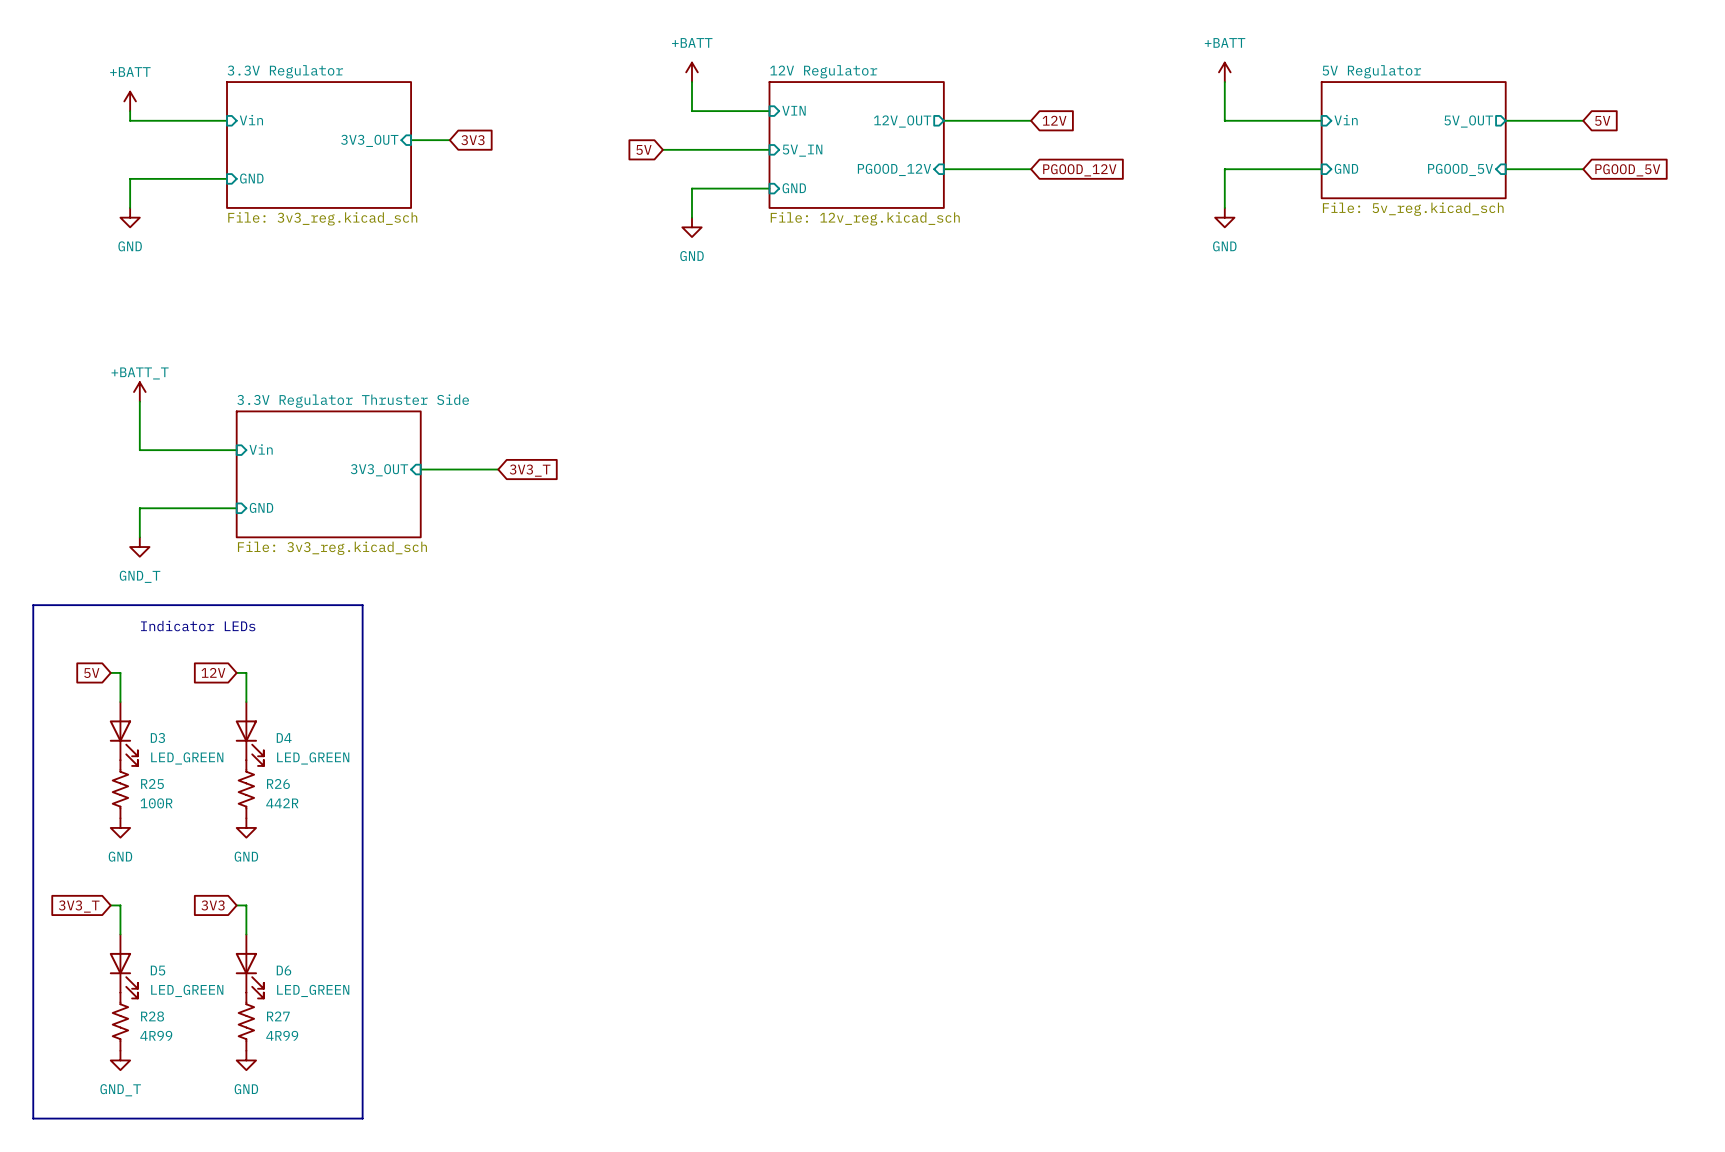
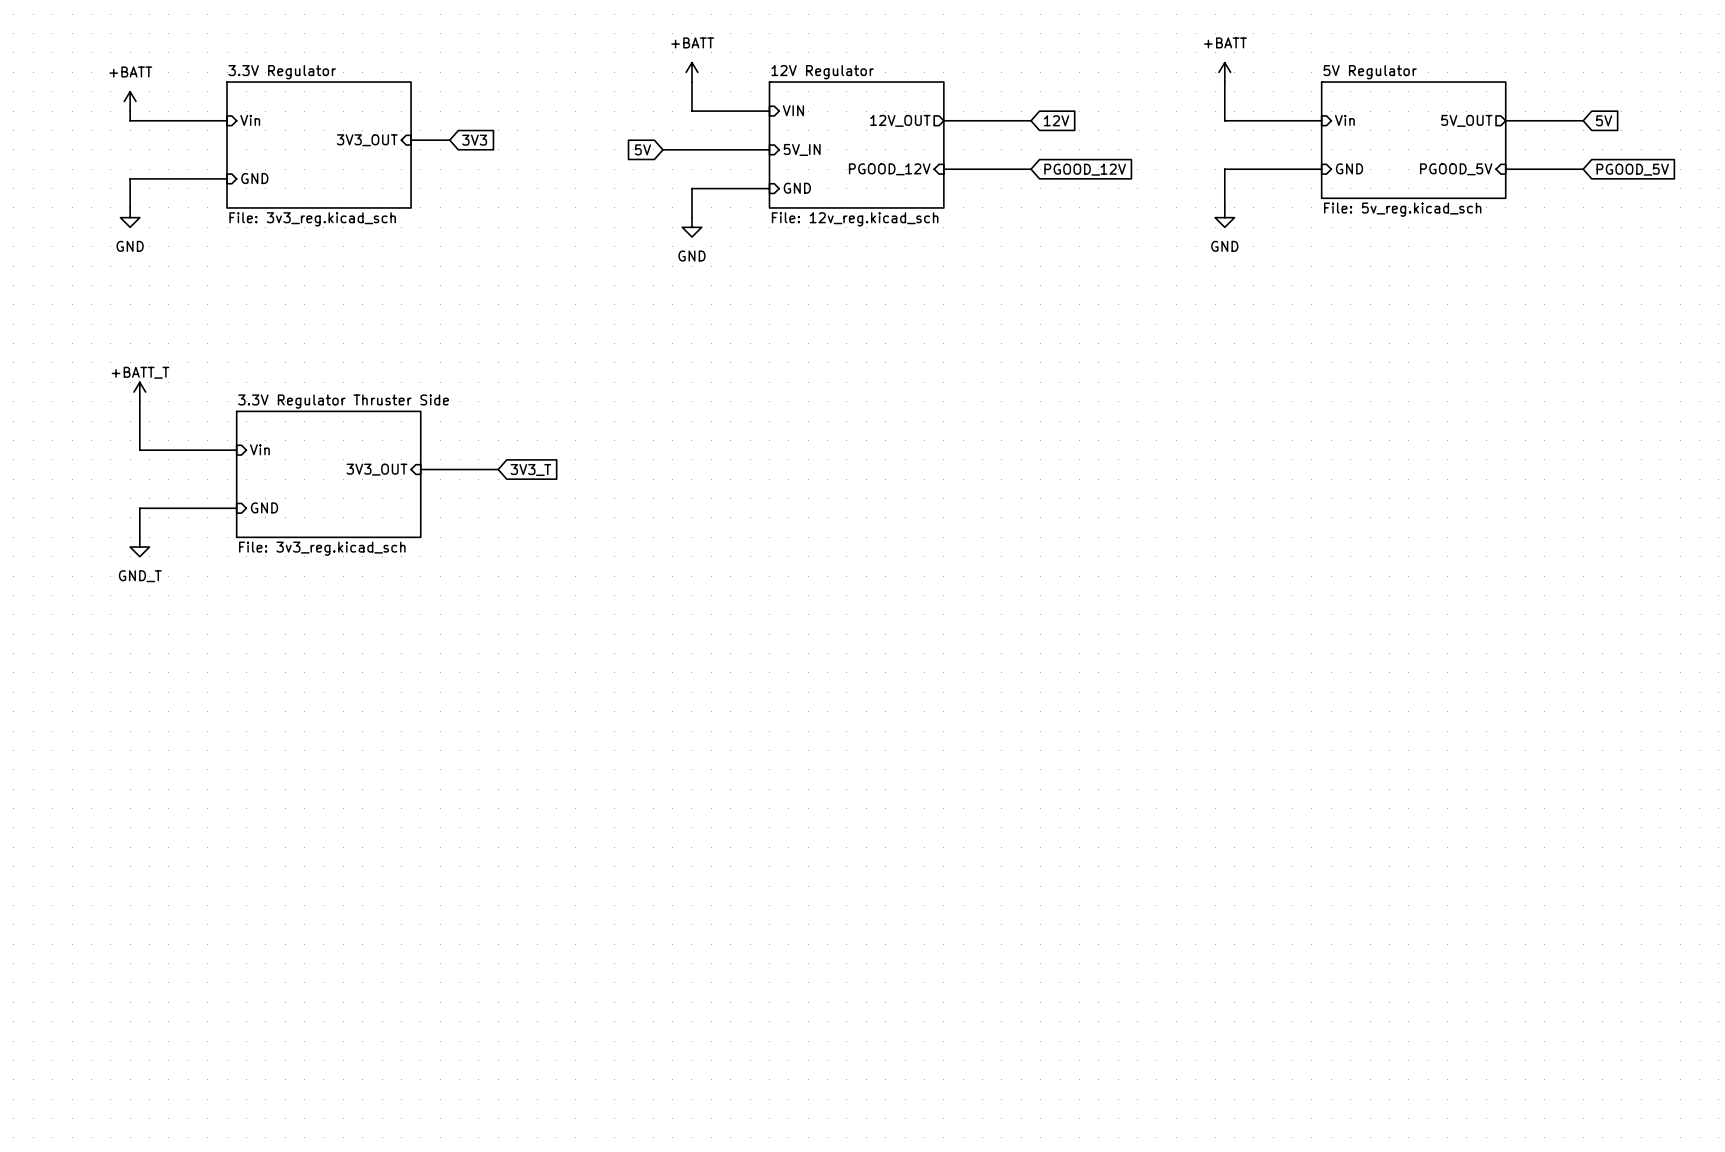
line: (33, 605) (362, 605) (362, 1118) (33, 1118) (33, 605) -> none
text: Indicator LEDs (198, 626) -> none
wire: (110, 672) (120, 672) (120, 702) -> none
global label: 12V (213, 672) -> none
wire: (236, 672) (246, 672) (246, 702) -> none
global label: 5V (91, 673) -> none
D3: LED_GREEN (123, 733) -> none
D4: LED_GREEN (249, 733) -> none
R25: 100R (120, 789) -> none
R26: 442R (246, 789) -> none
power symbol: GND (120, 827) -> none
power symbol: GND (246, 827) -> none
wire: (110, 905) (120, 905) (120, 934) -> none
global label: 3V3 (213, 905) -> none
wire: (236, 905) (246, 905) (246, 934) -> none
global label: 3V3_T (79, 906) -> none
D5: LED_GREEN (123, 966) -> none
D6: LED_GREEN (249, 966) -> none
R28: 4R99 (120, 1021) -> none
R27: 4R99 (246, 1021) -> none
power symbol: GND_T (120, 1060) -> none
power symbol: GND (246, 1060) -> none

